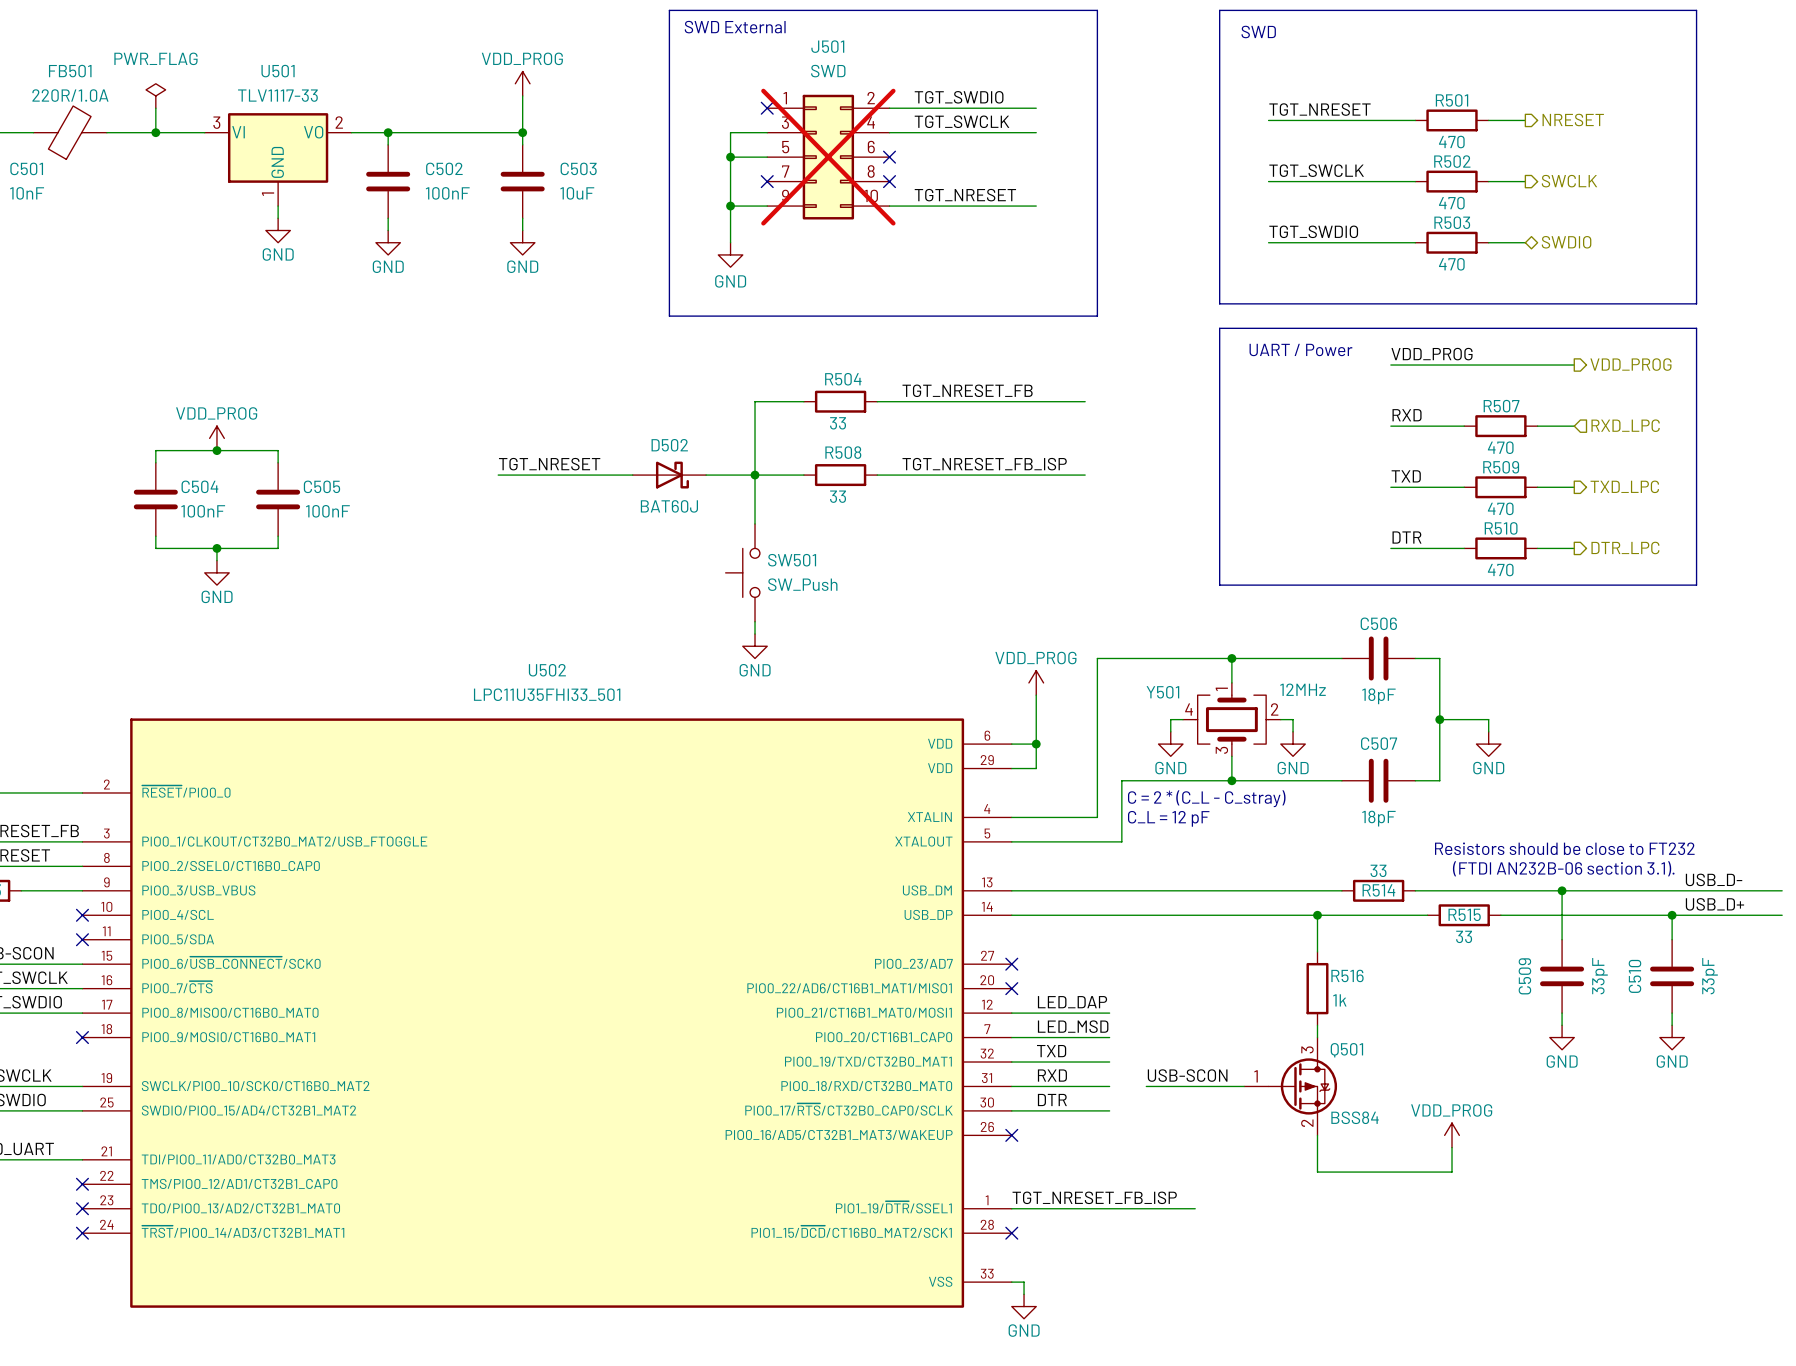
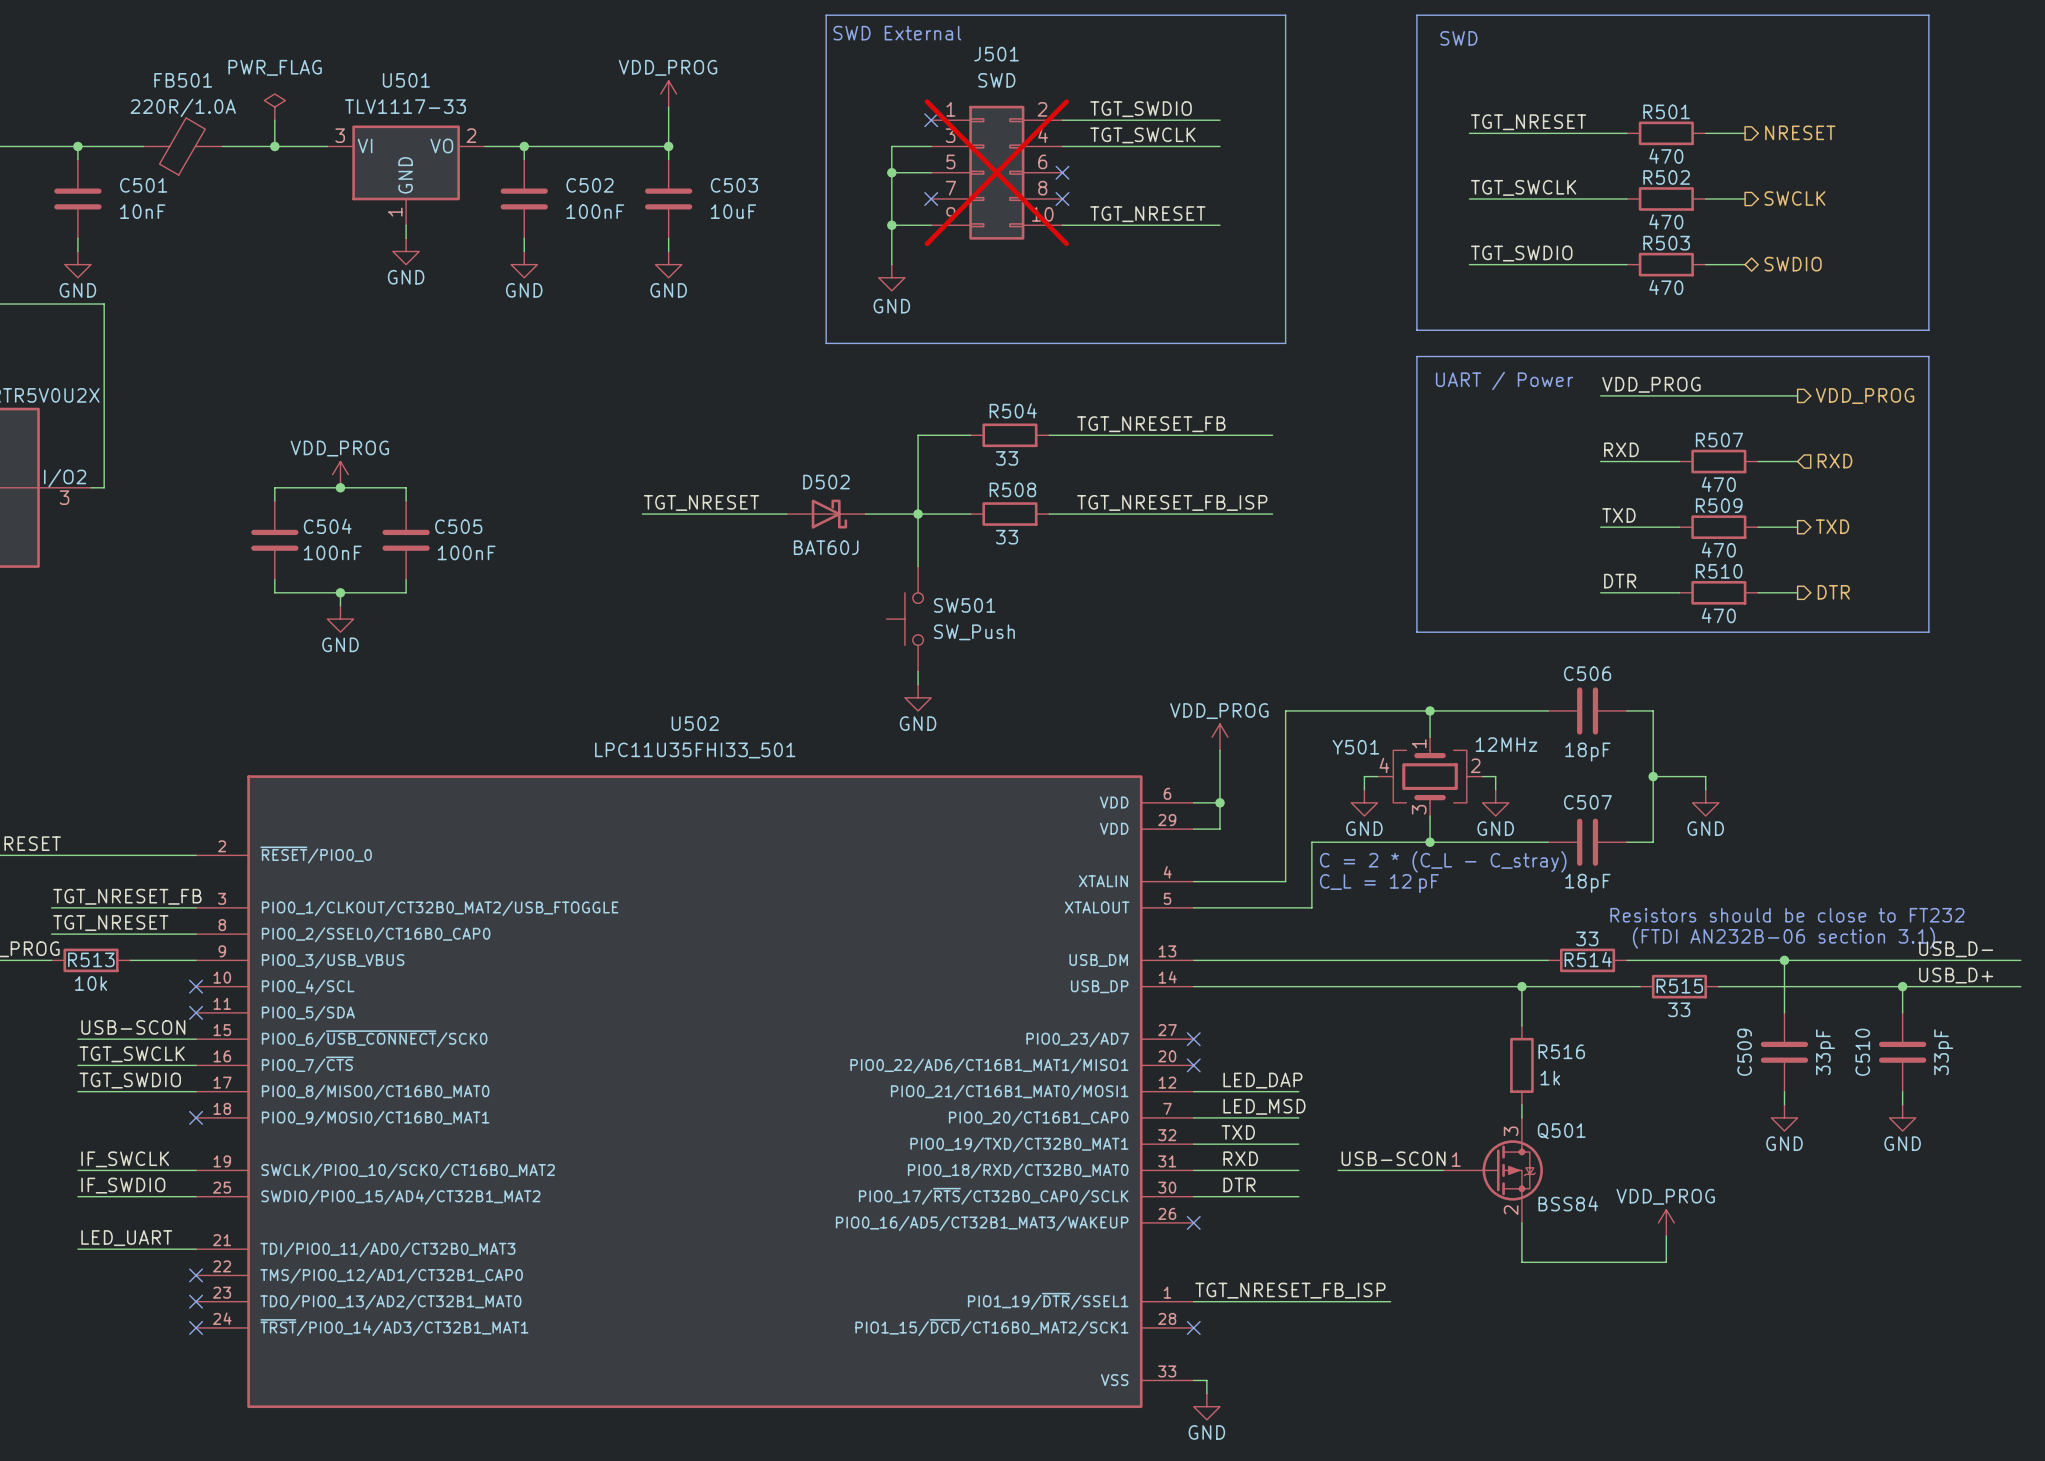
hierarchical label: RXD_LPC (1625, 425) -> RXD (1835, 461)
hierarchical label: TXD_LPC (1624, 486) -> TXD (1832, 526)
hierarchical label: DTR_LPC (1625, 547) -> DTR (1833, 592)

